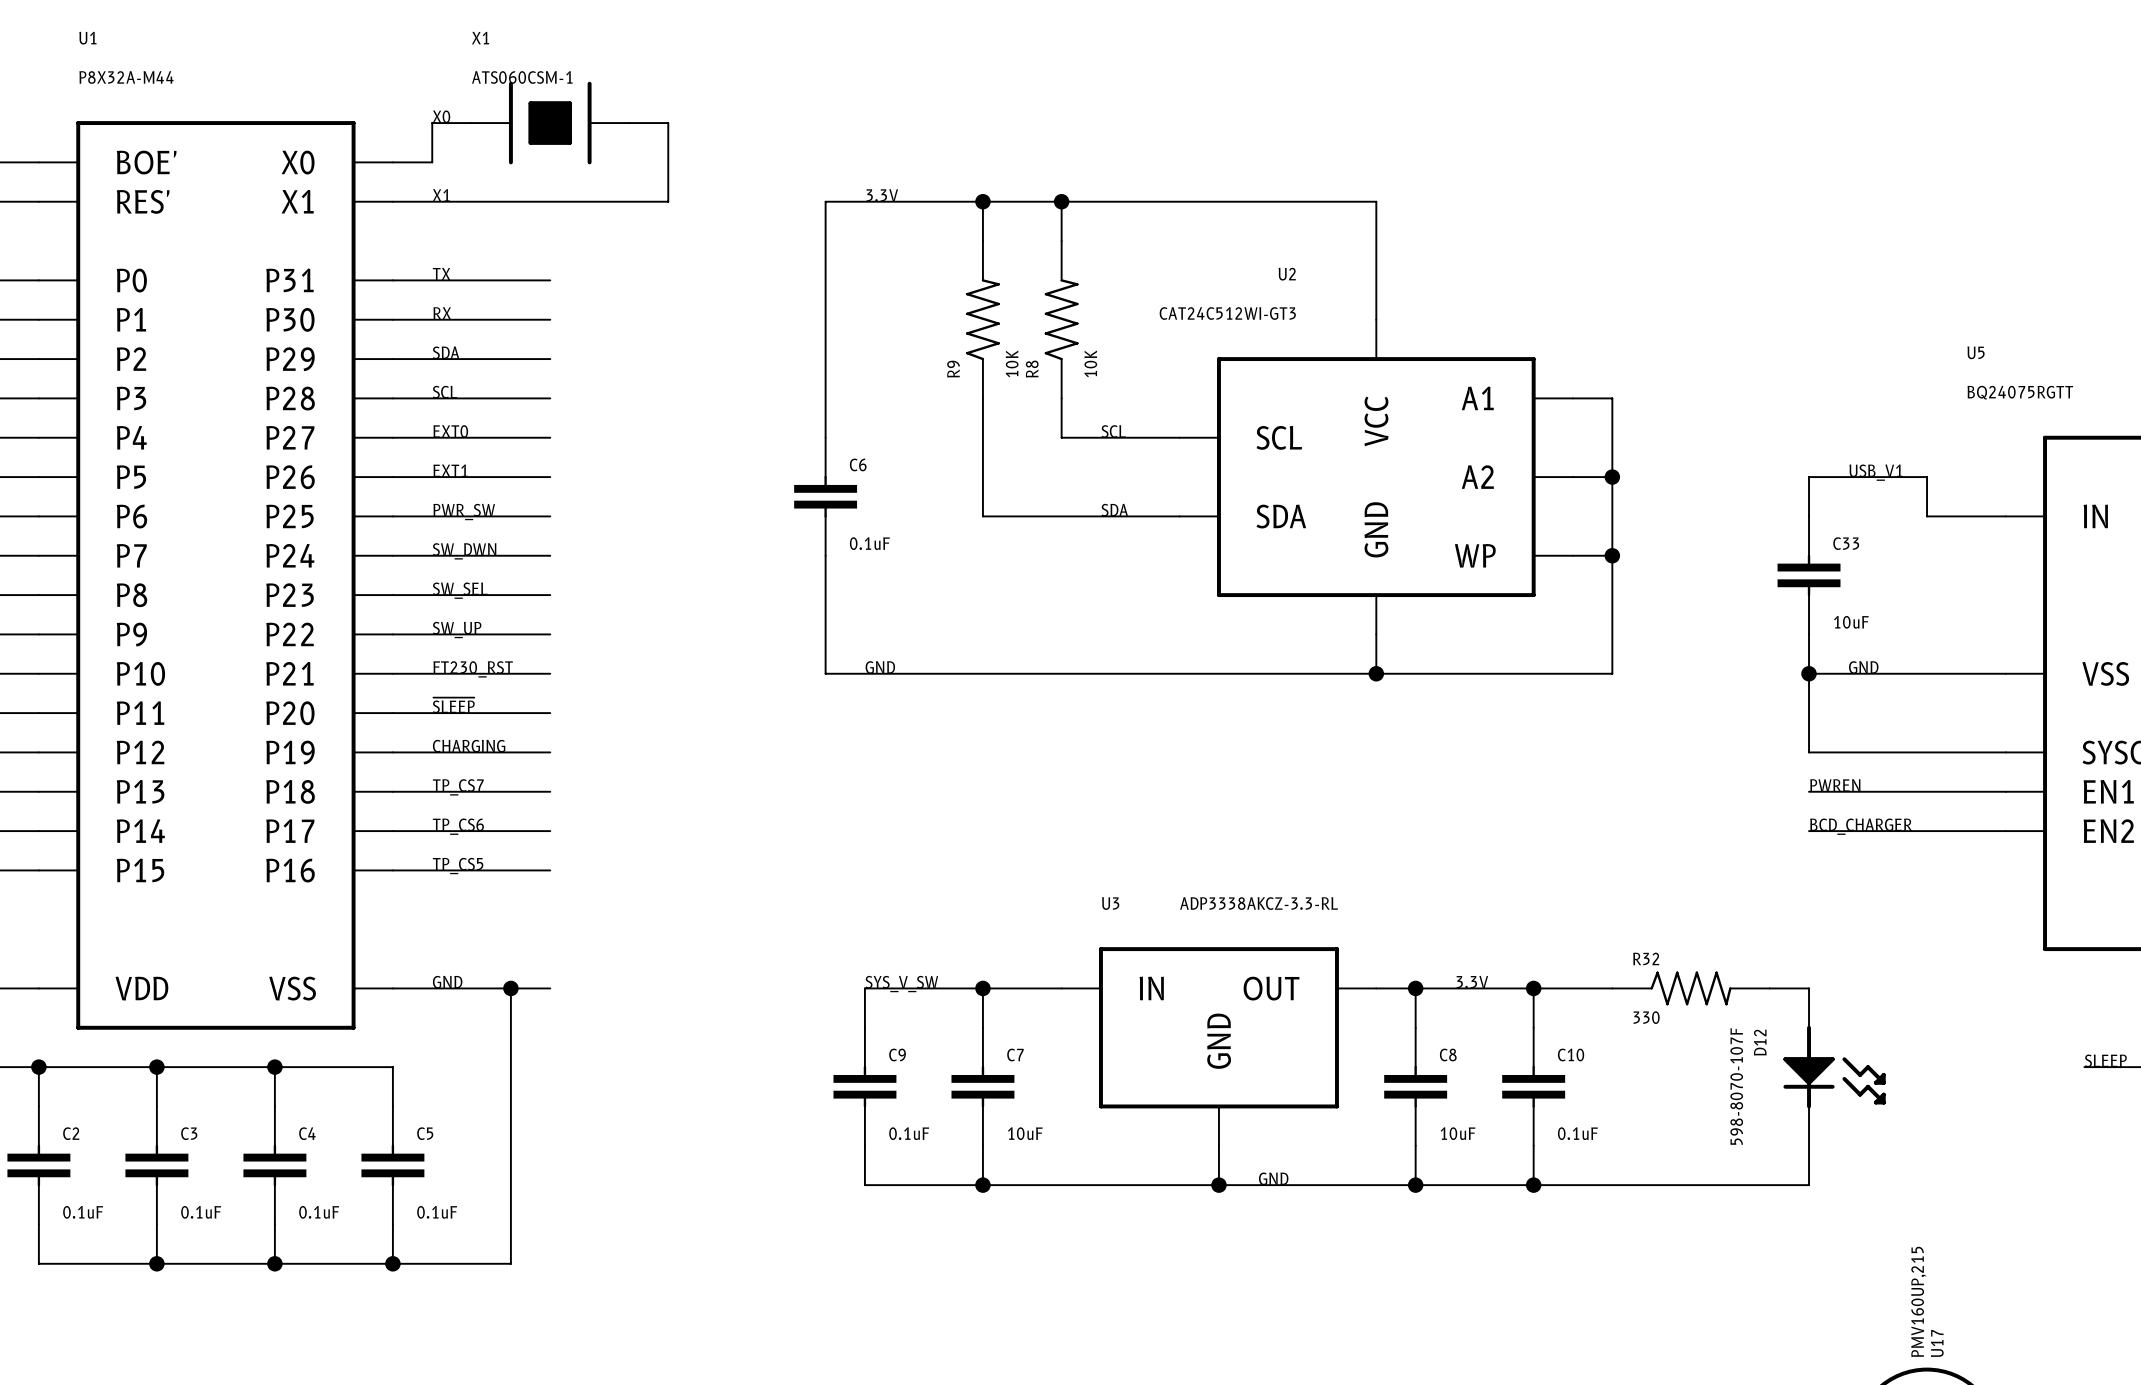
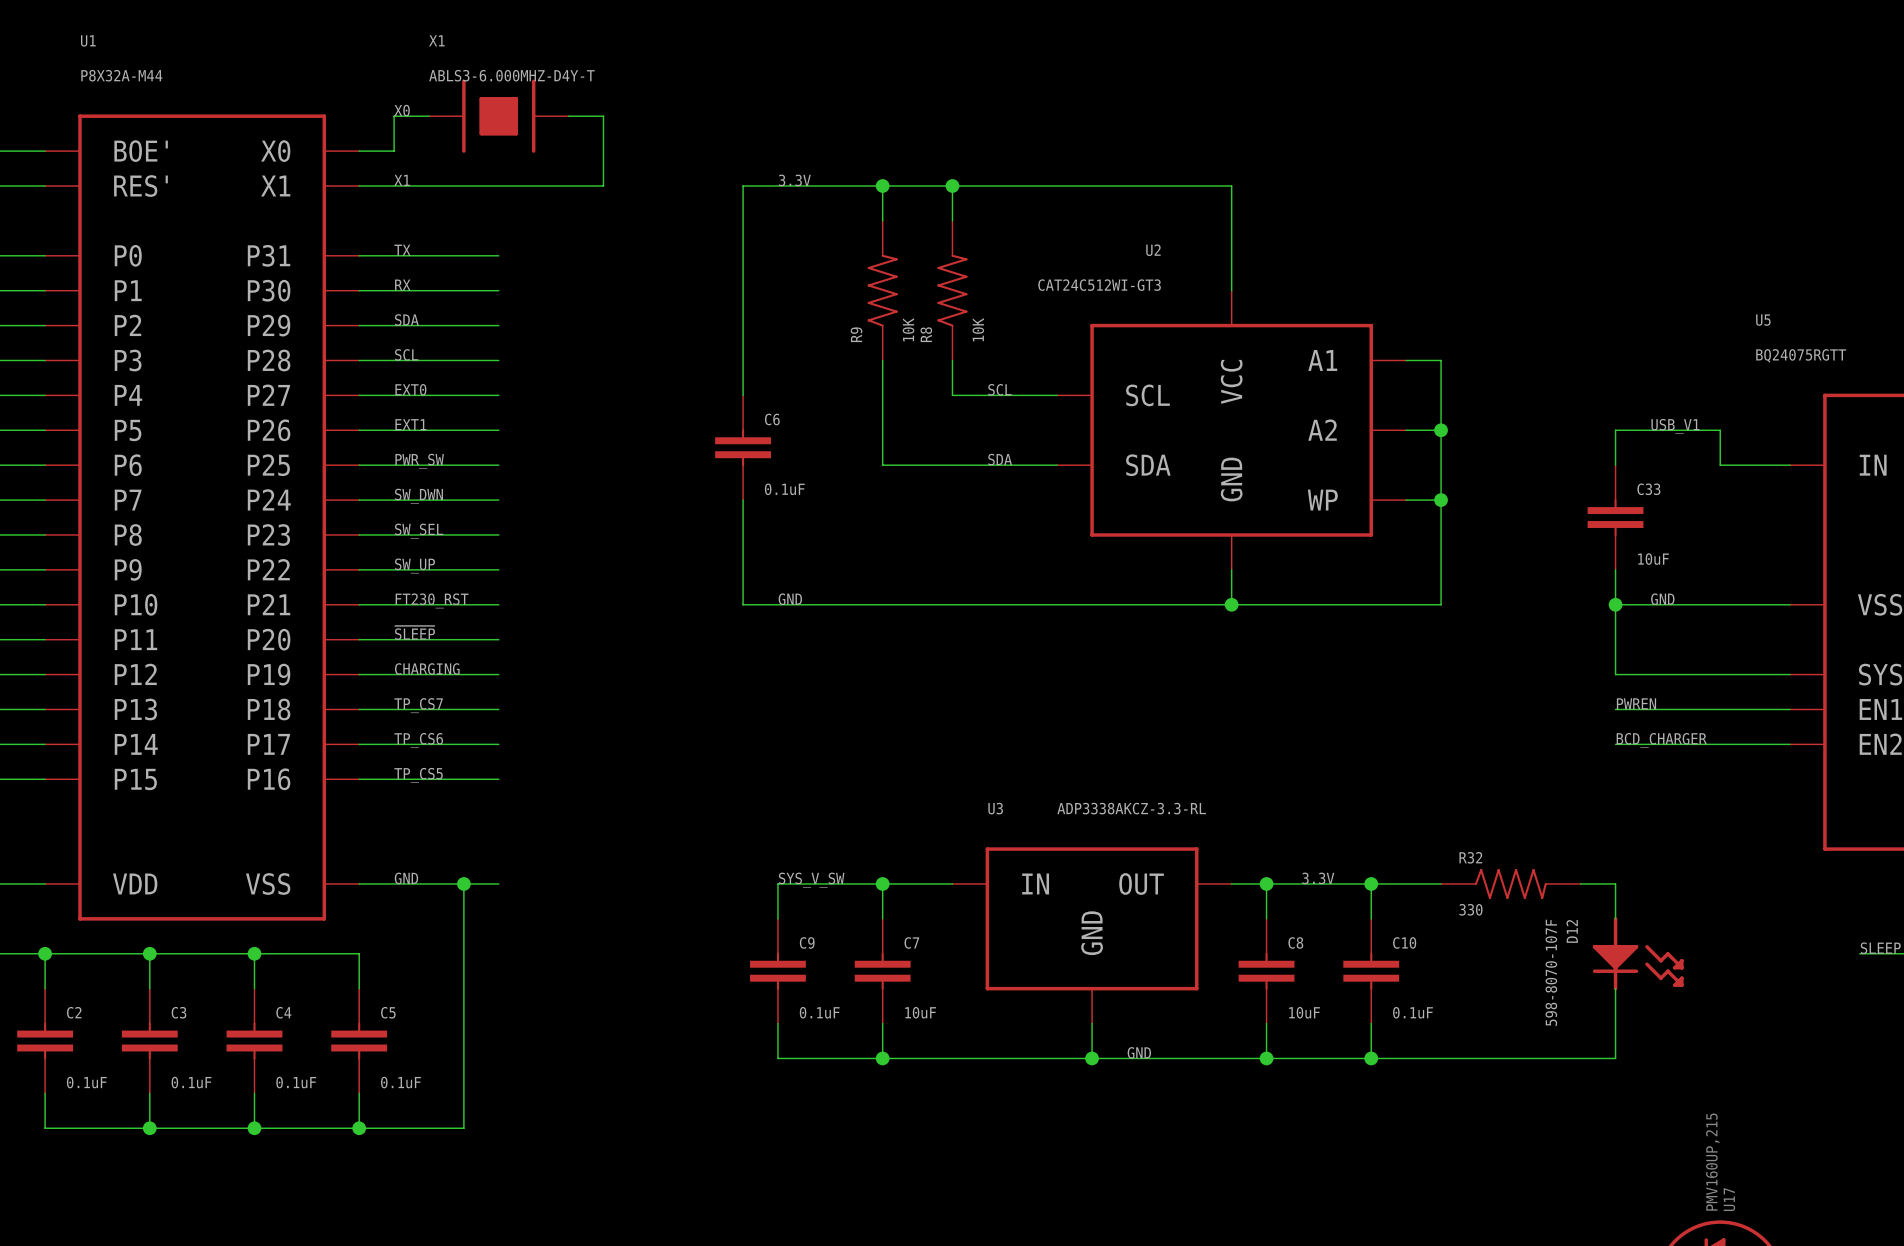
X1 value: ATS060CSM-1 (522, 77) -> ABLS3-6.000MHZ-D4Y-T (511, 75)

